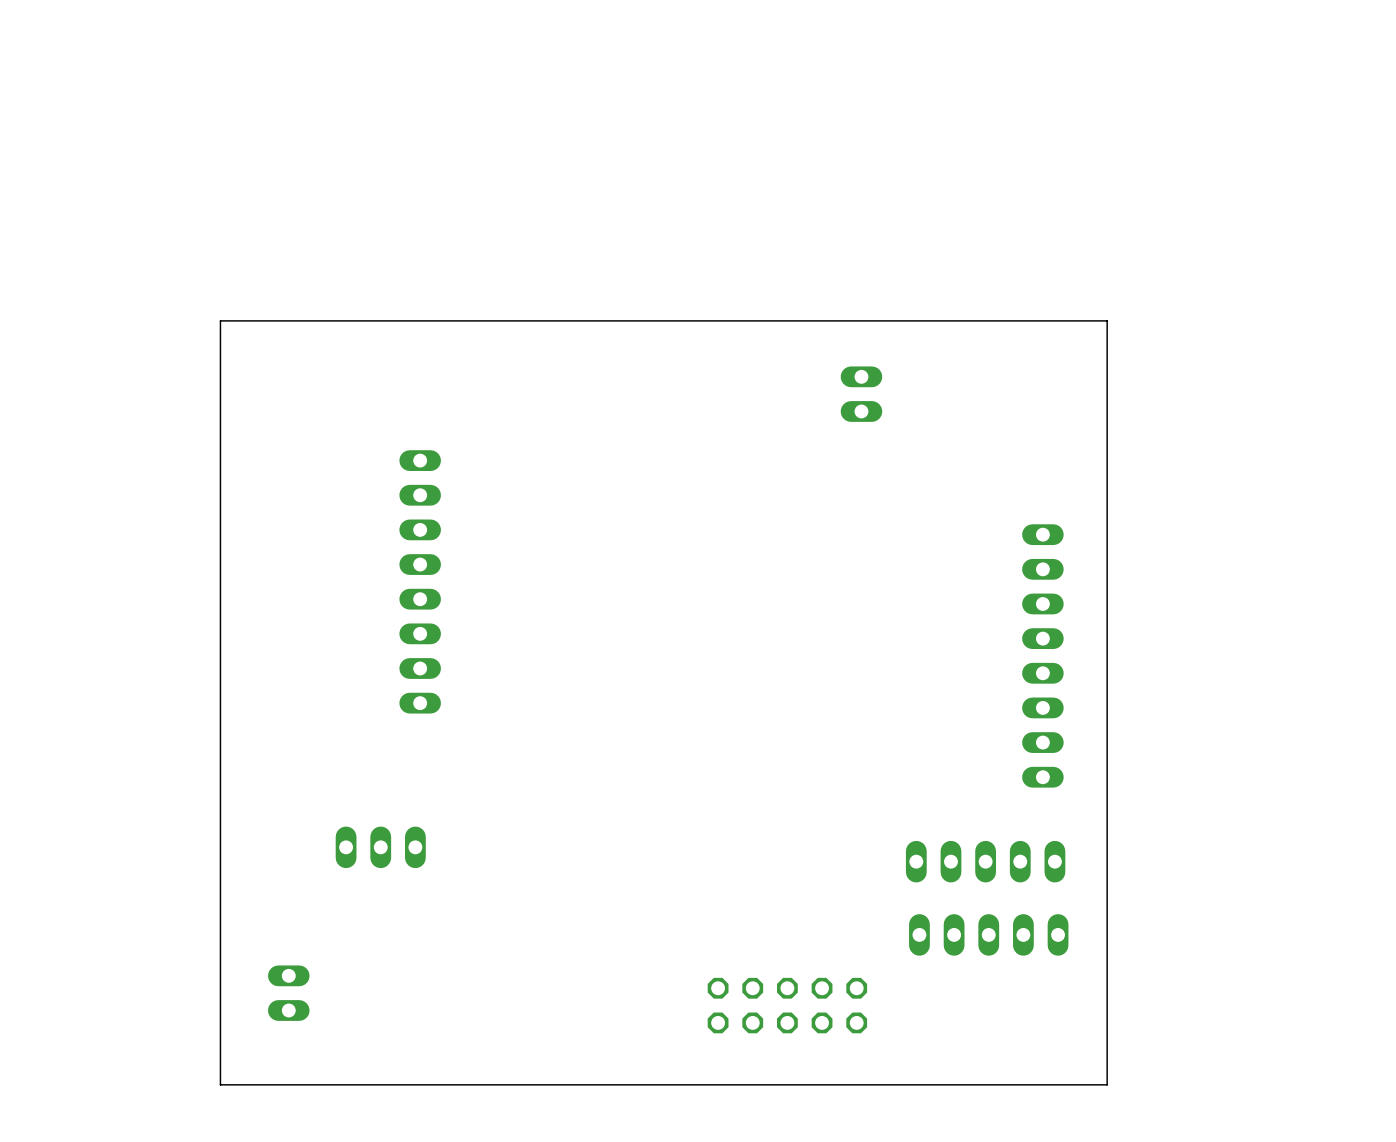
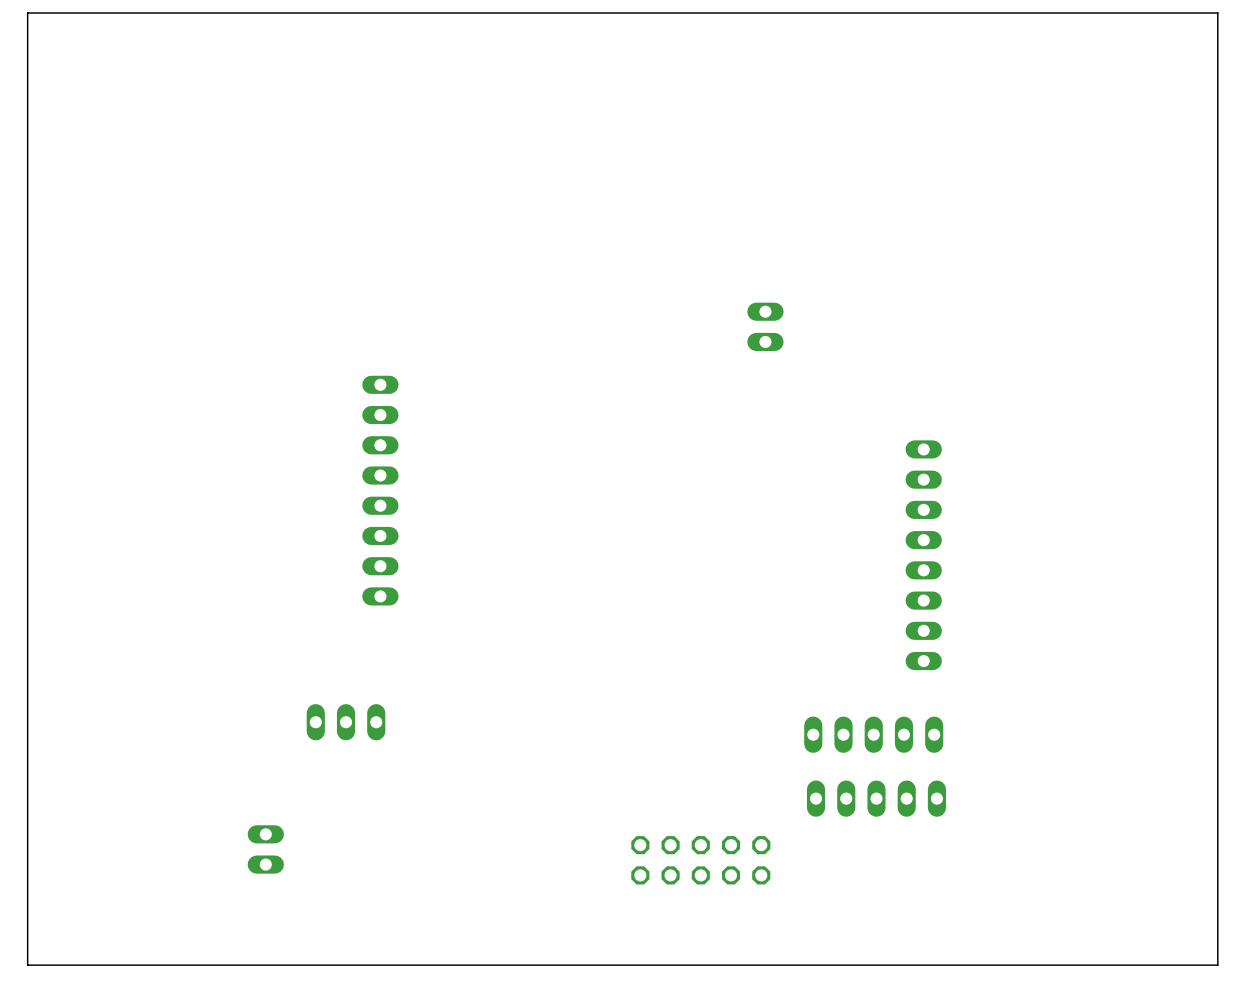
board edge: none -> (1217, 13) (27, 13) (27, 965) (1217, 965) (1217, 13)
board edge: (1107, 320) (220, 320) (220, 1084) (1107, 1084) (1107, 320) -> none

